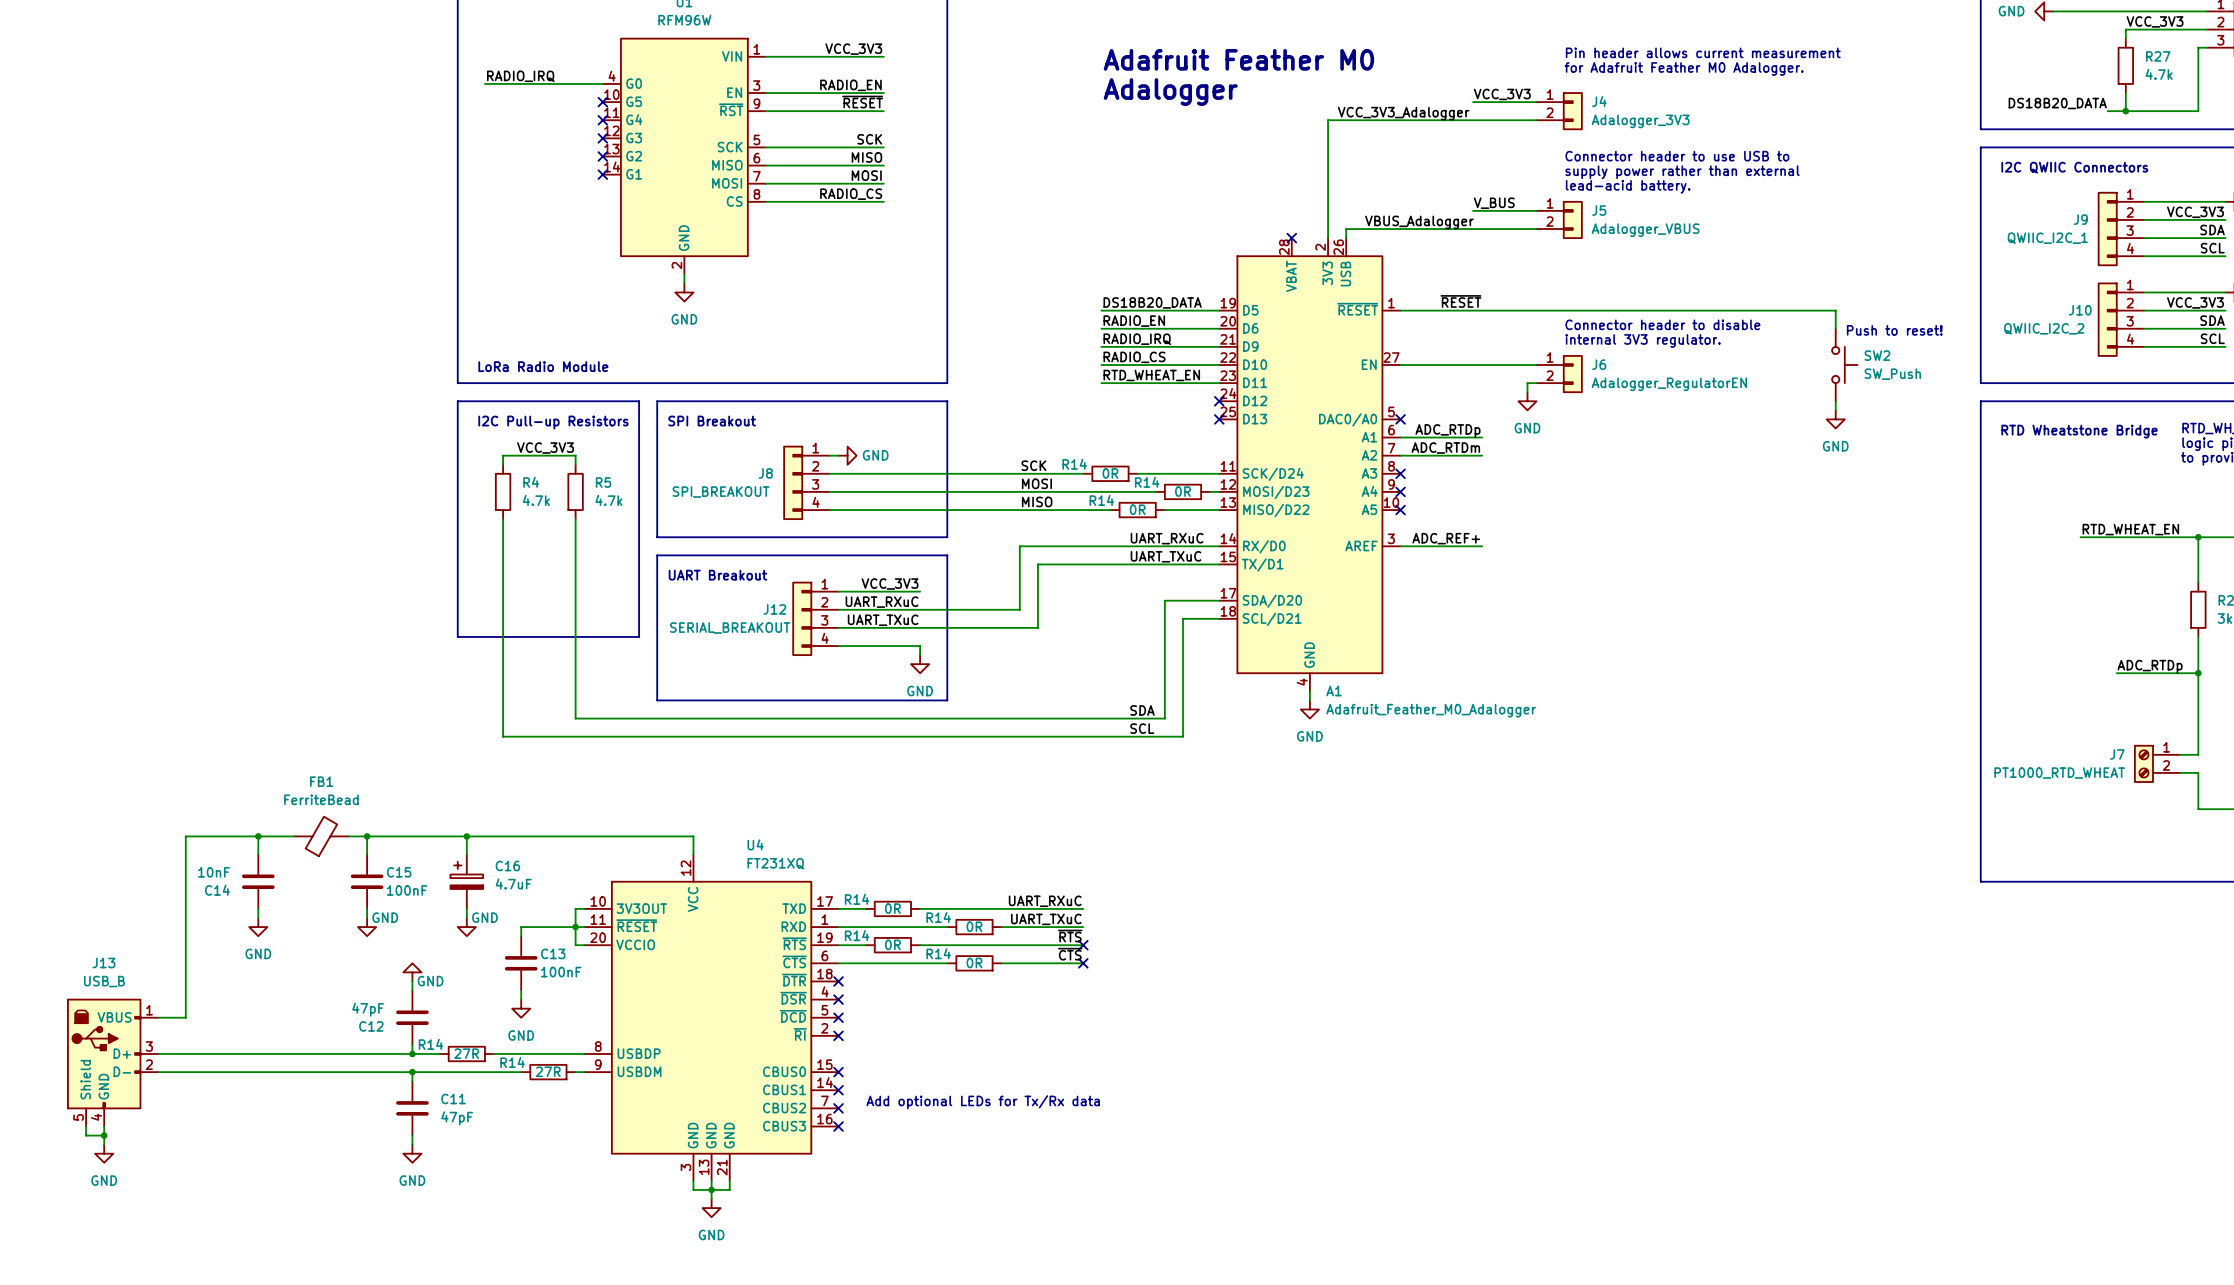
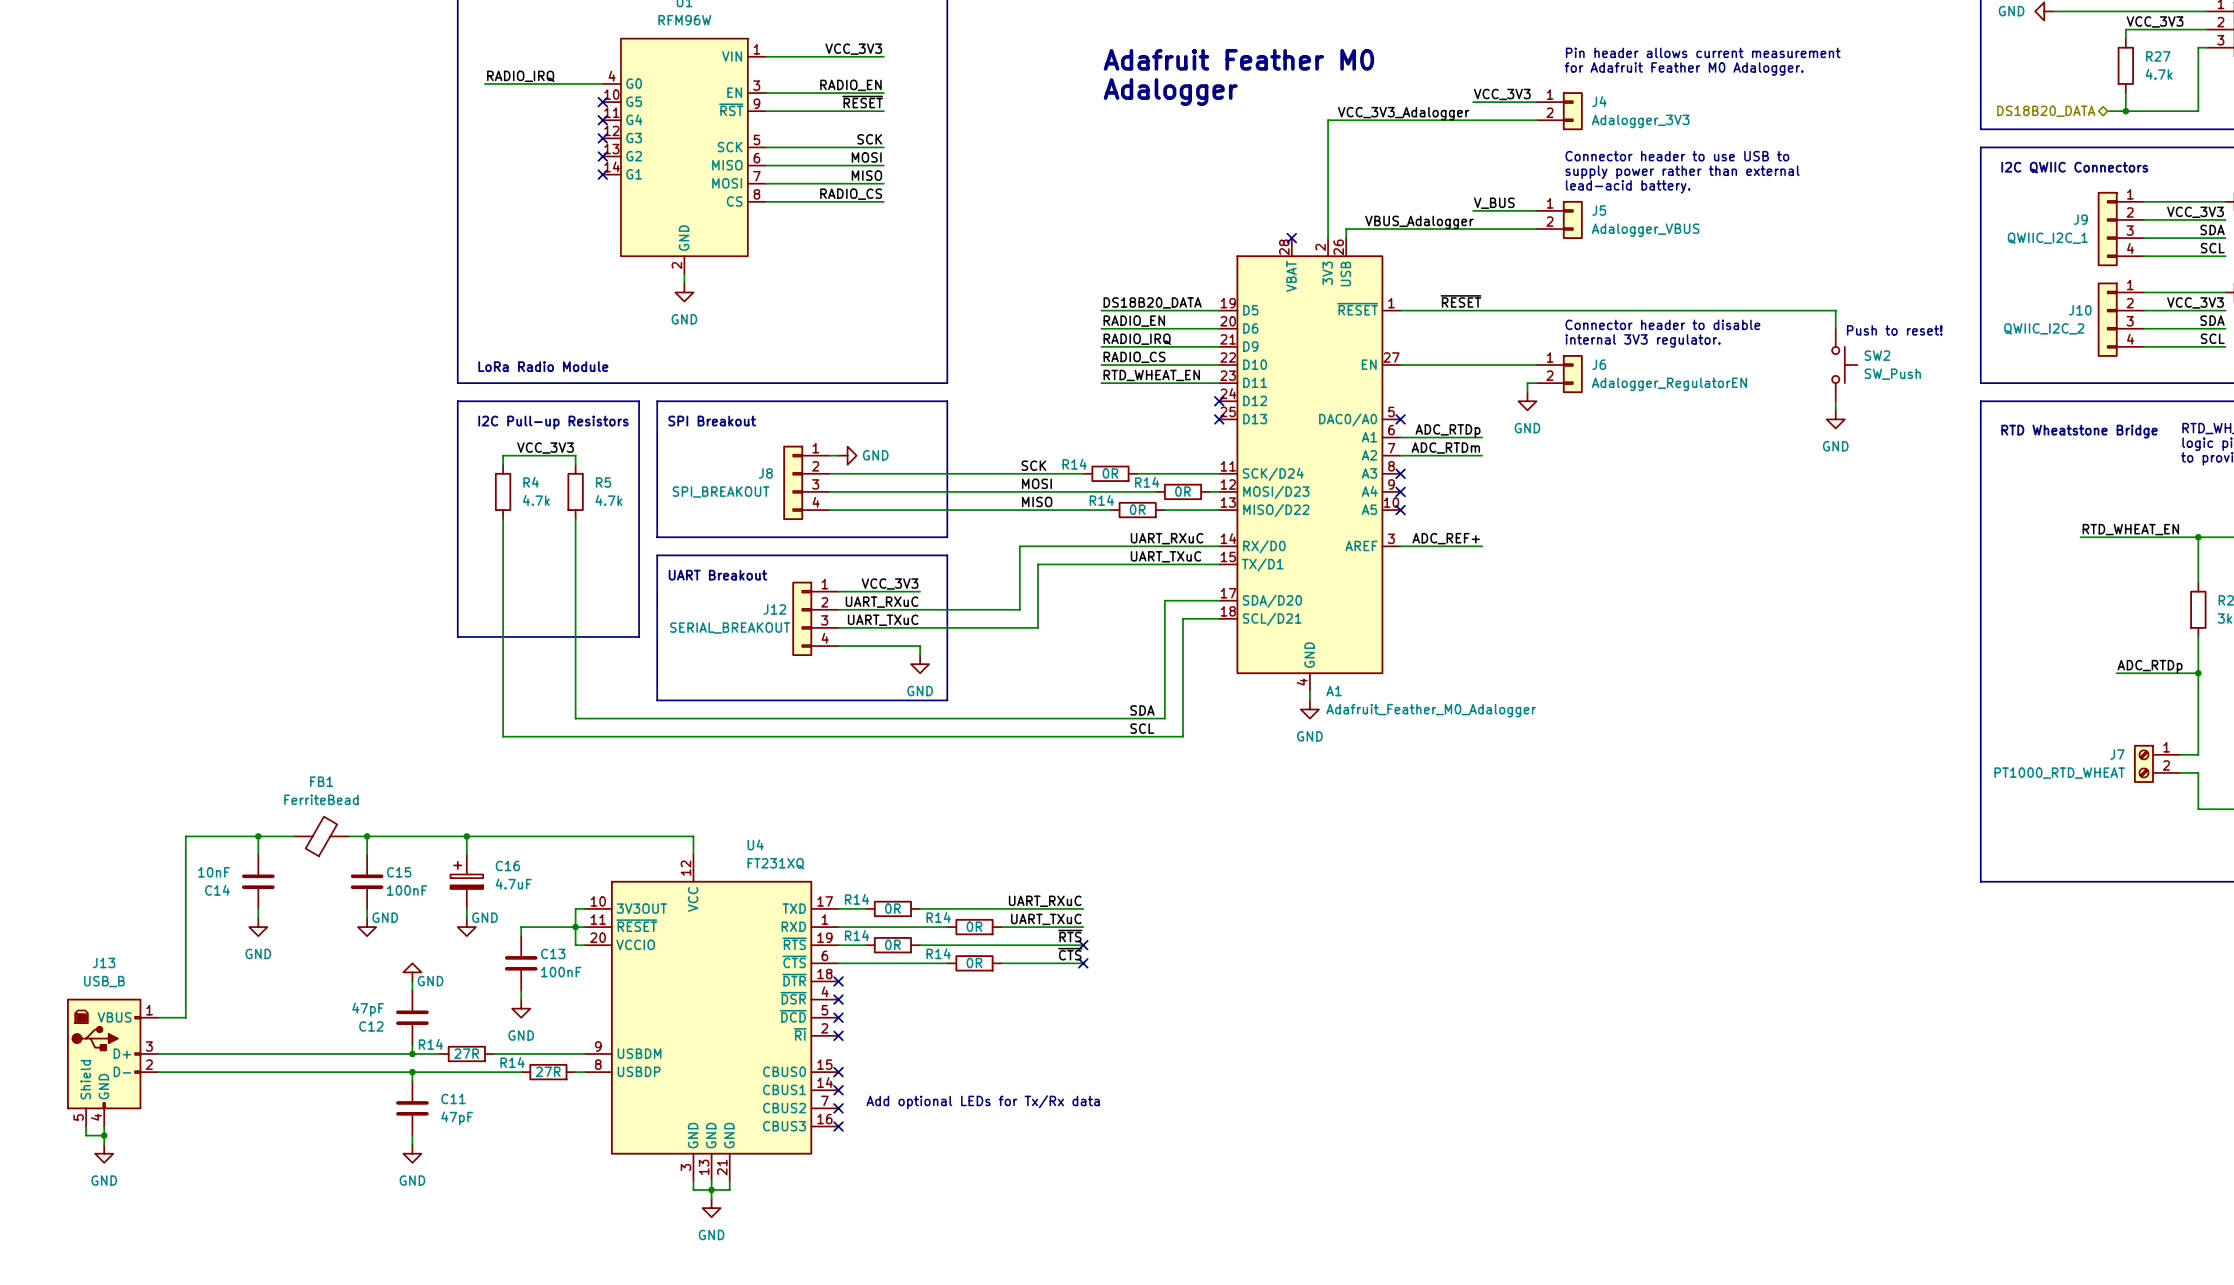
label: DS18B20_DATA (2057, 103) -> none
hierarchical label: none -> DS18B20_DATA (2046, 111)
label: MISO (866, 157) -> MOSI (866, 157)
label: MOSI (866, 175) -> MISO (866, 175)
U4 pin number: 8 (598, 1046) -> 9 (598, 1046)
U4 pin name: USBDP (639, 1053) -> USBDM (639, 1053)
U4 pin number: 9 (598, 1064) -> 8 (598, 1064)
U4 pin name: USBDM (639, 1071) -> USBDP (639, 1071)

